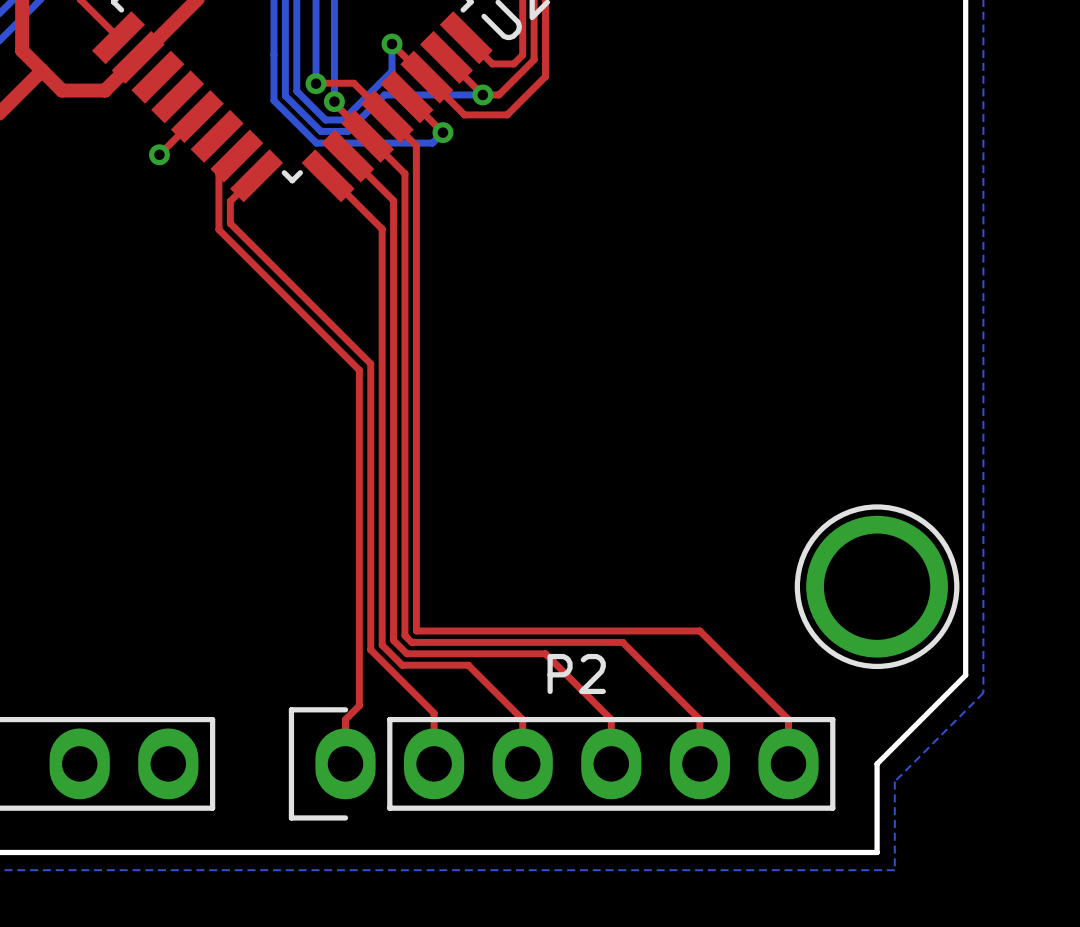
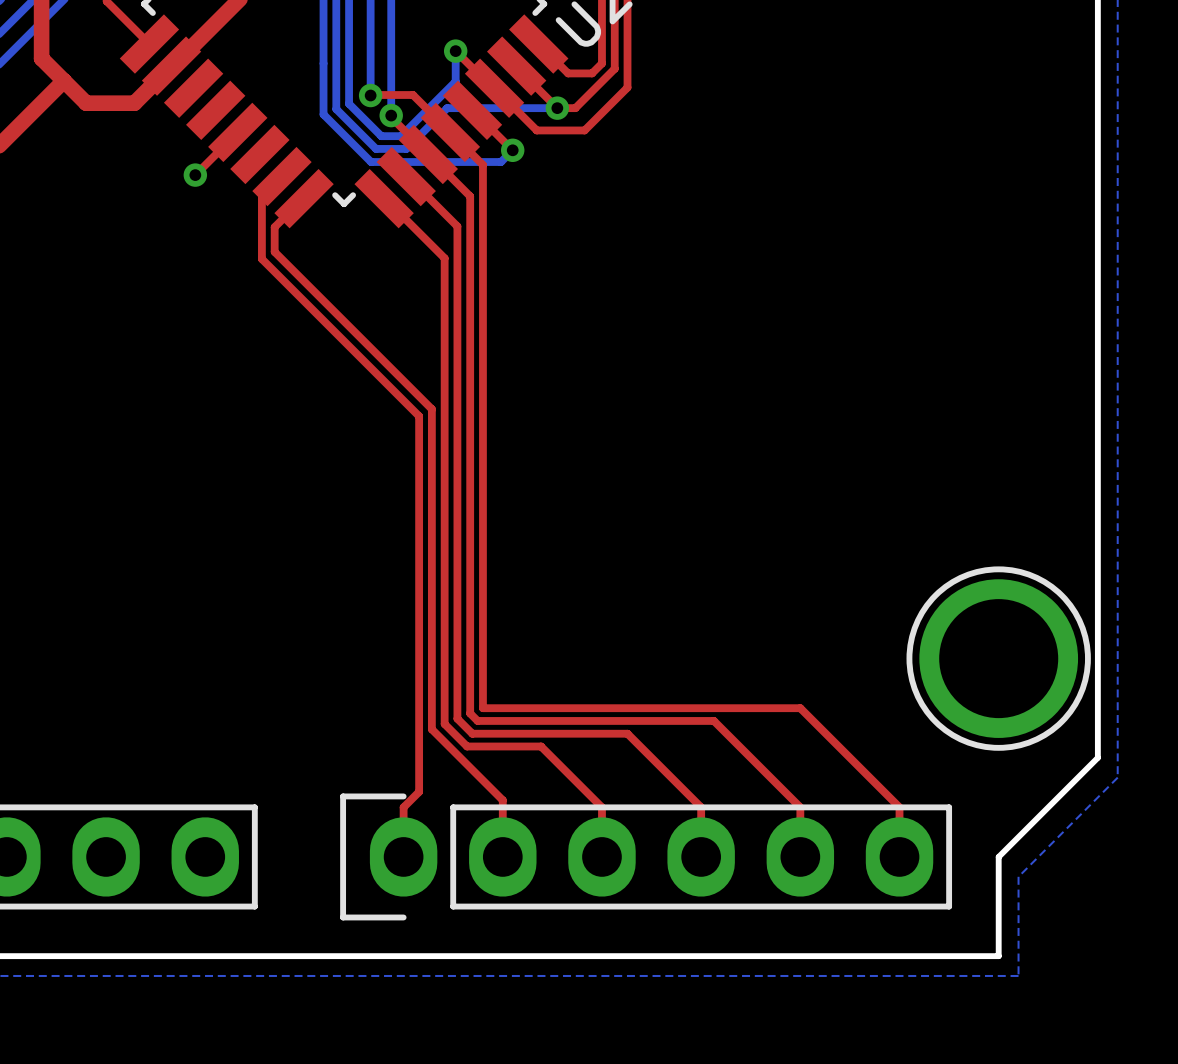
P2 name: P2 (576, 673) -> none

